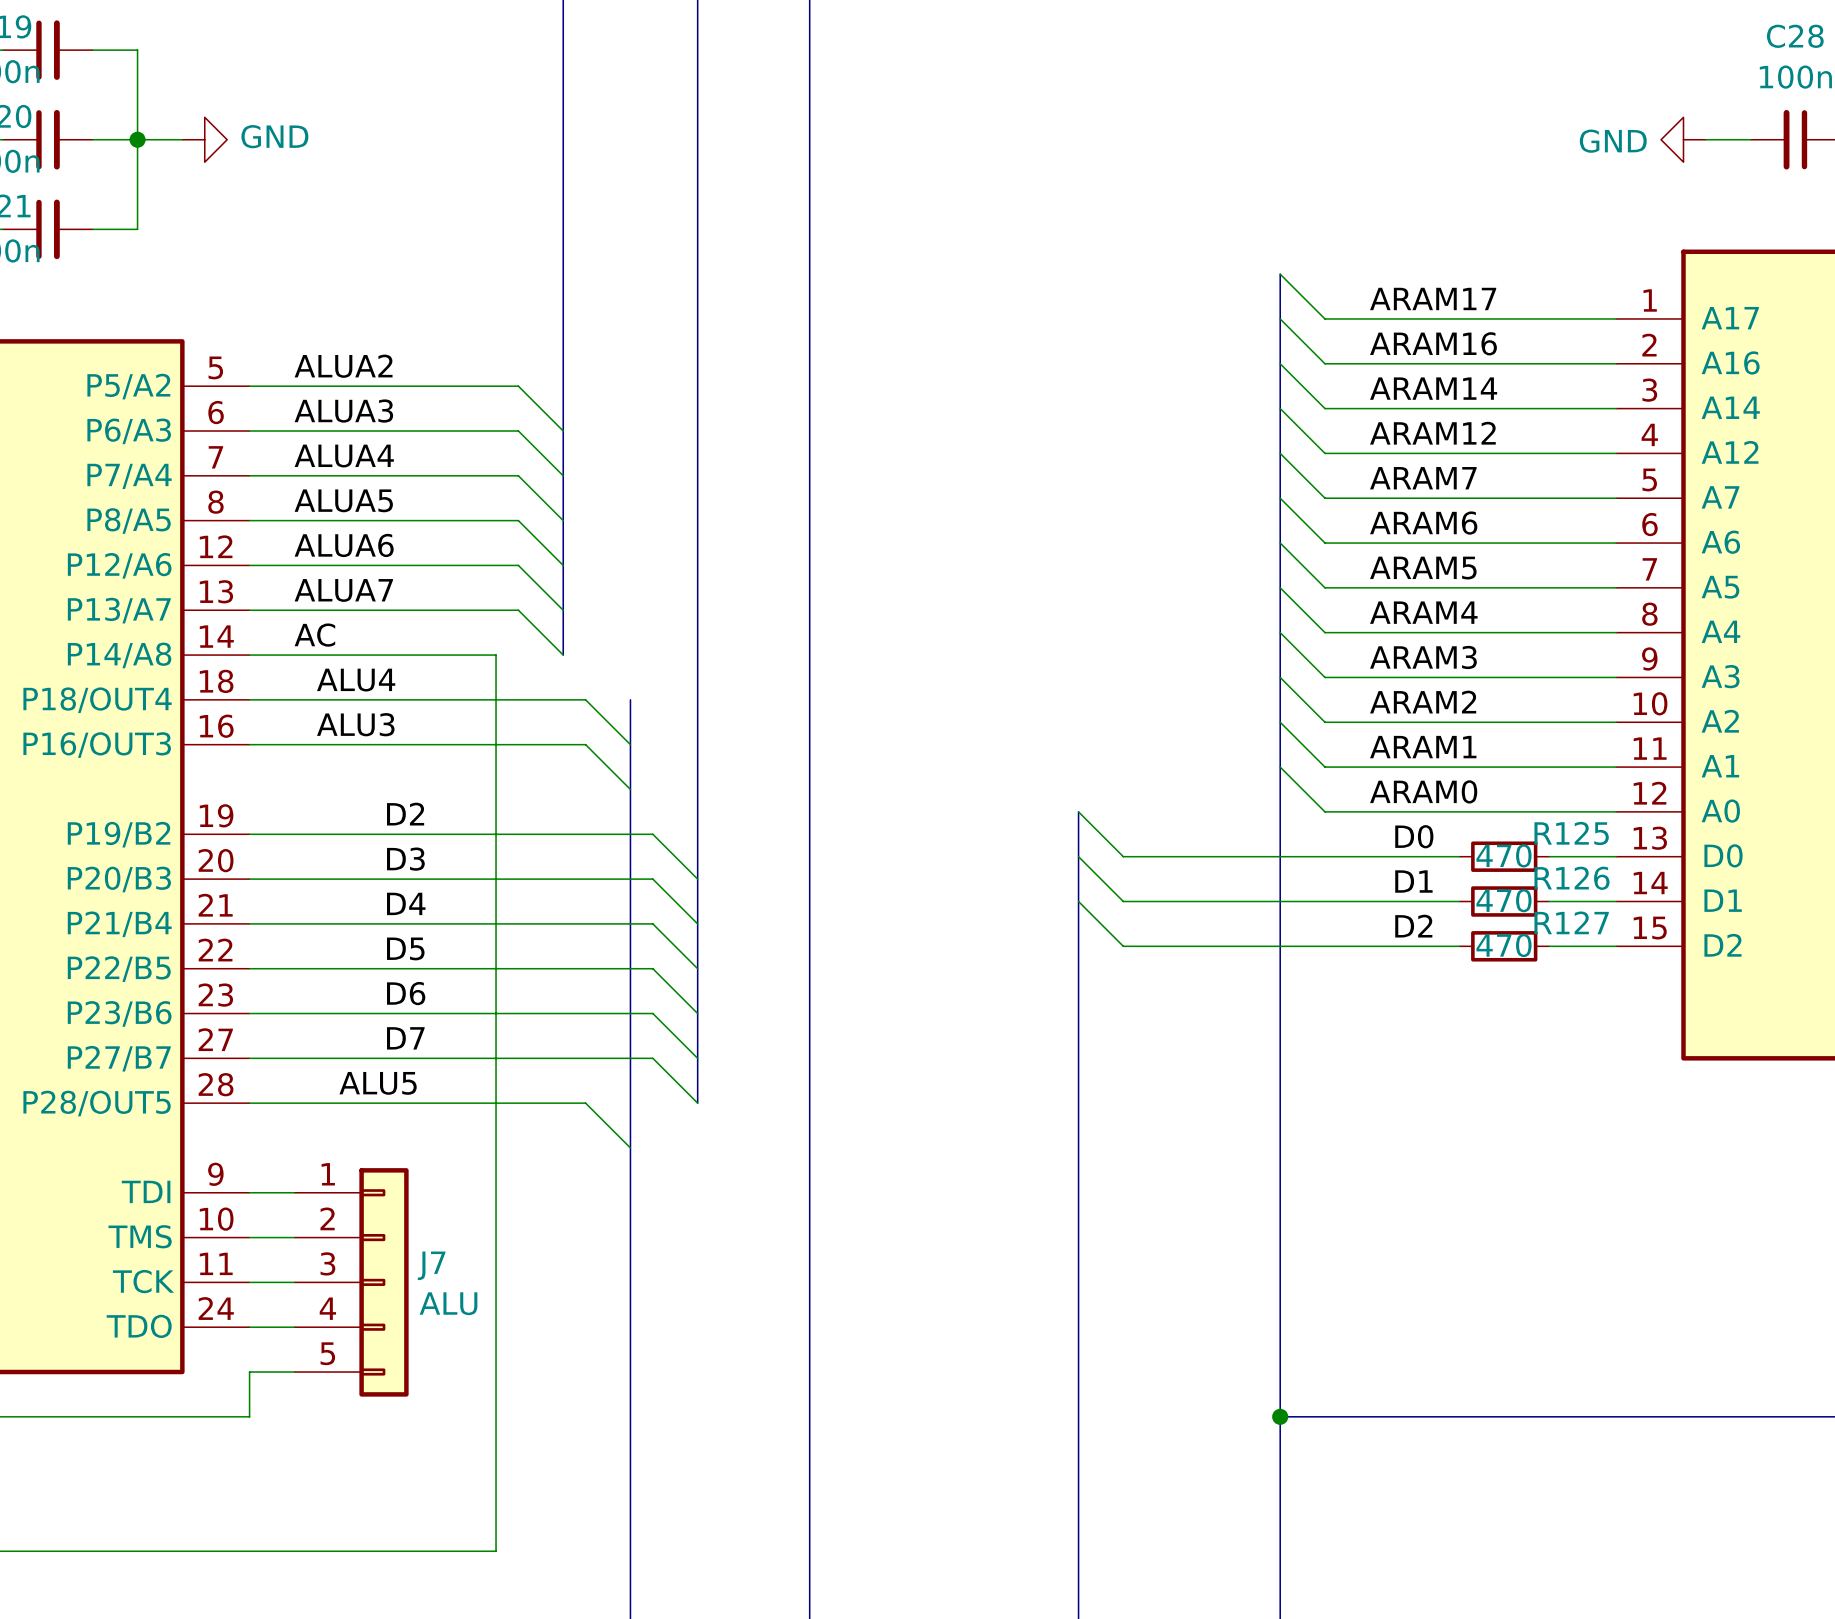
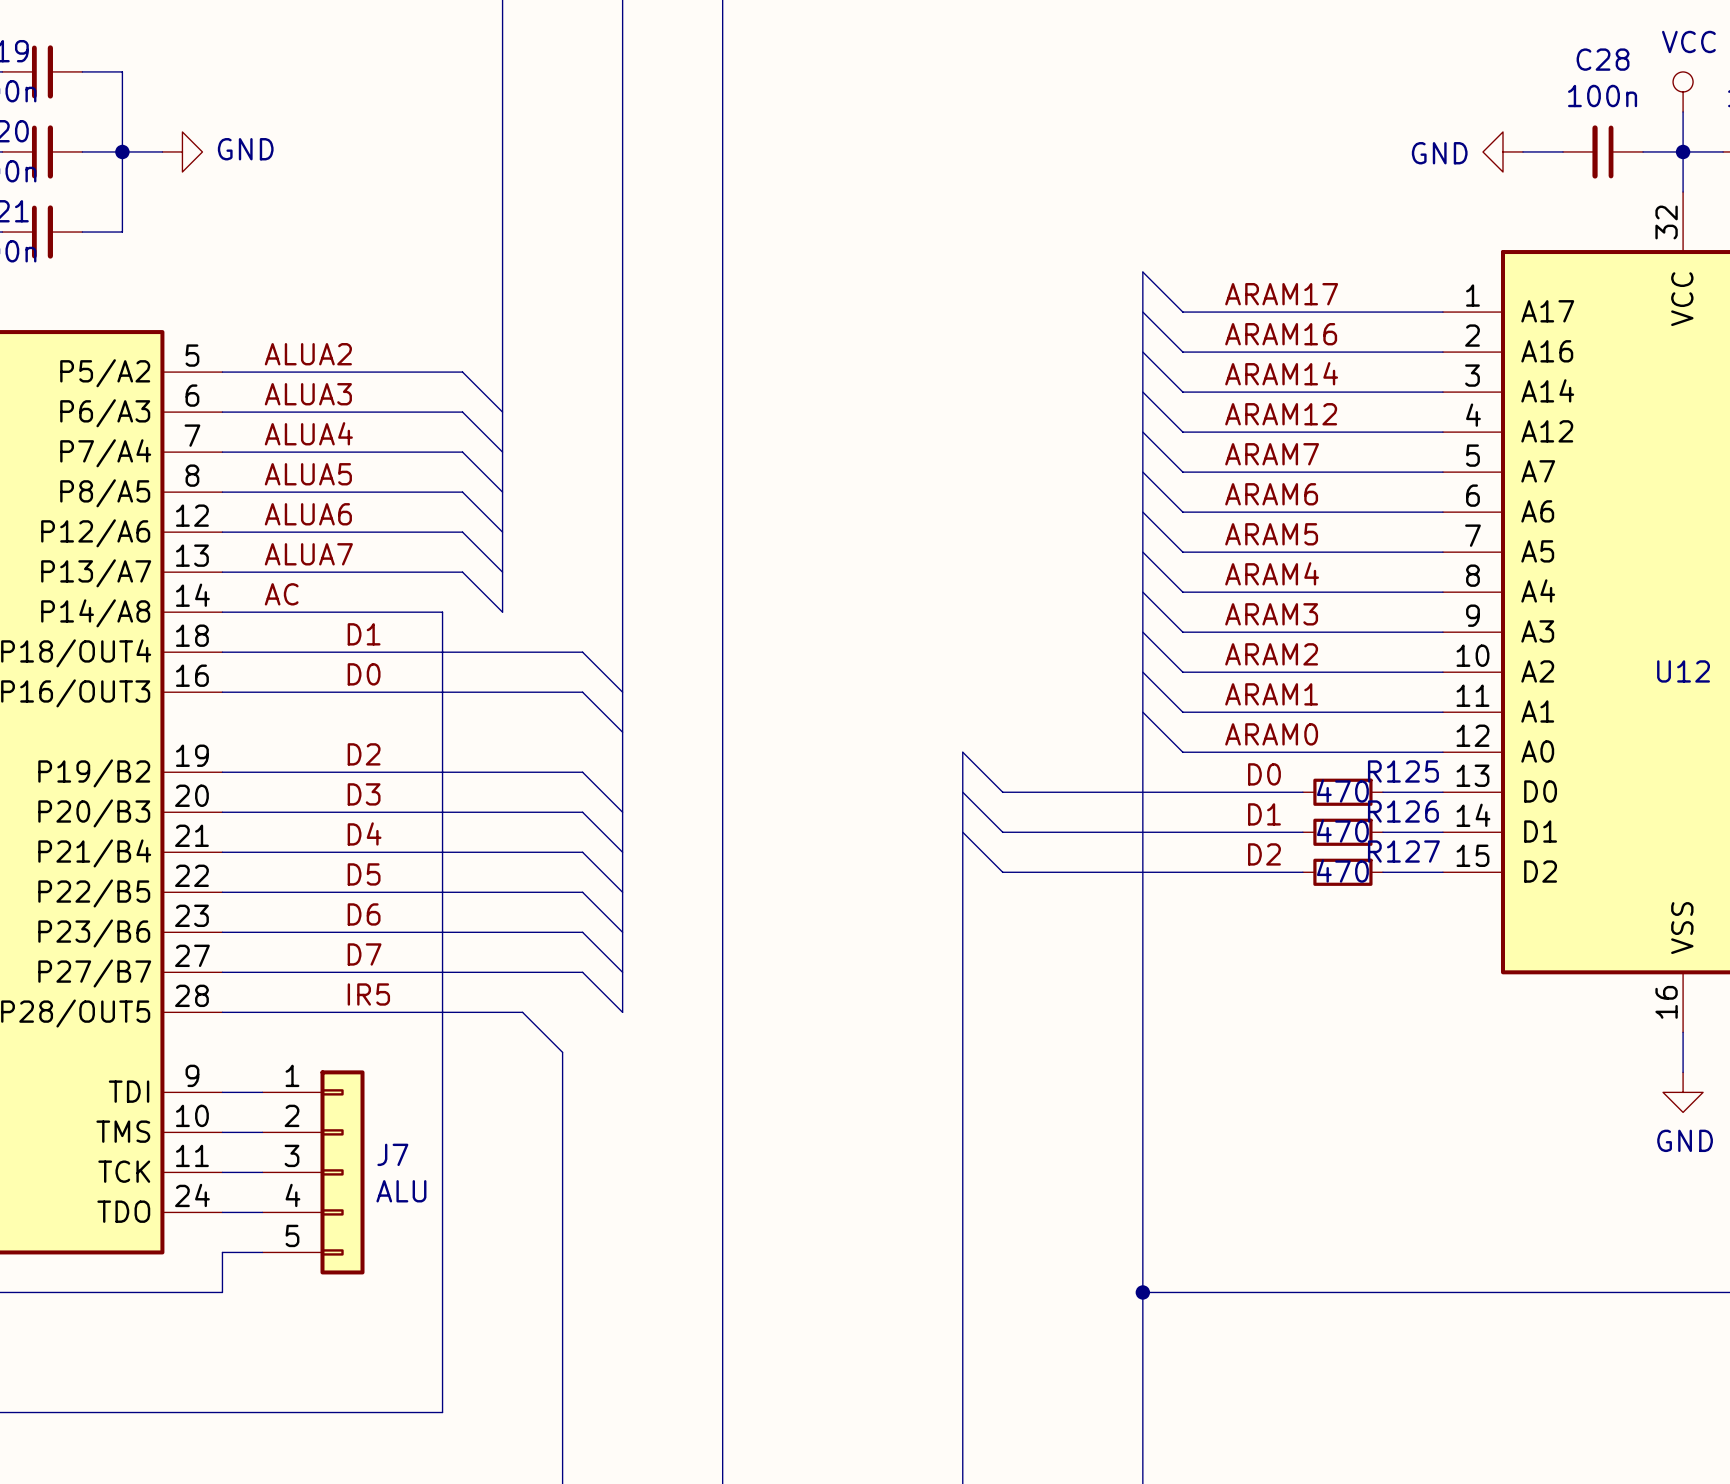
label: none -> D1 (364, 634)
label: ALU4 (356, 680) -> none
wire: (585, 699) (630, 744) -> (522, 652) (582, 652) (622, 692)
bus: (630, 699) (630, 1147) -> none
label: ALU3 (355, 724) -> none
label: none -> D0 (364, 674)
wire: (585, 744) (630, 789) -> (522, 692) (582, 692) (622, 732)
label: ALU5 (378, 1083) -> none
label: none -> IR5 (368, 994)

